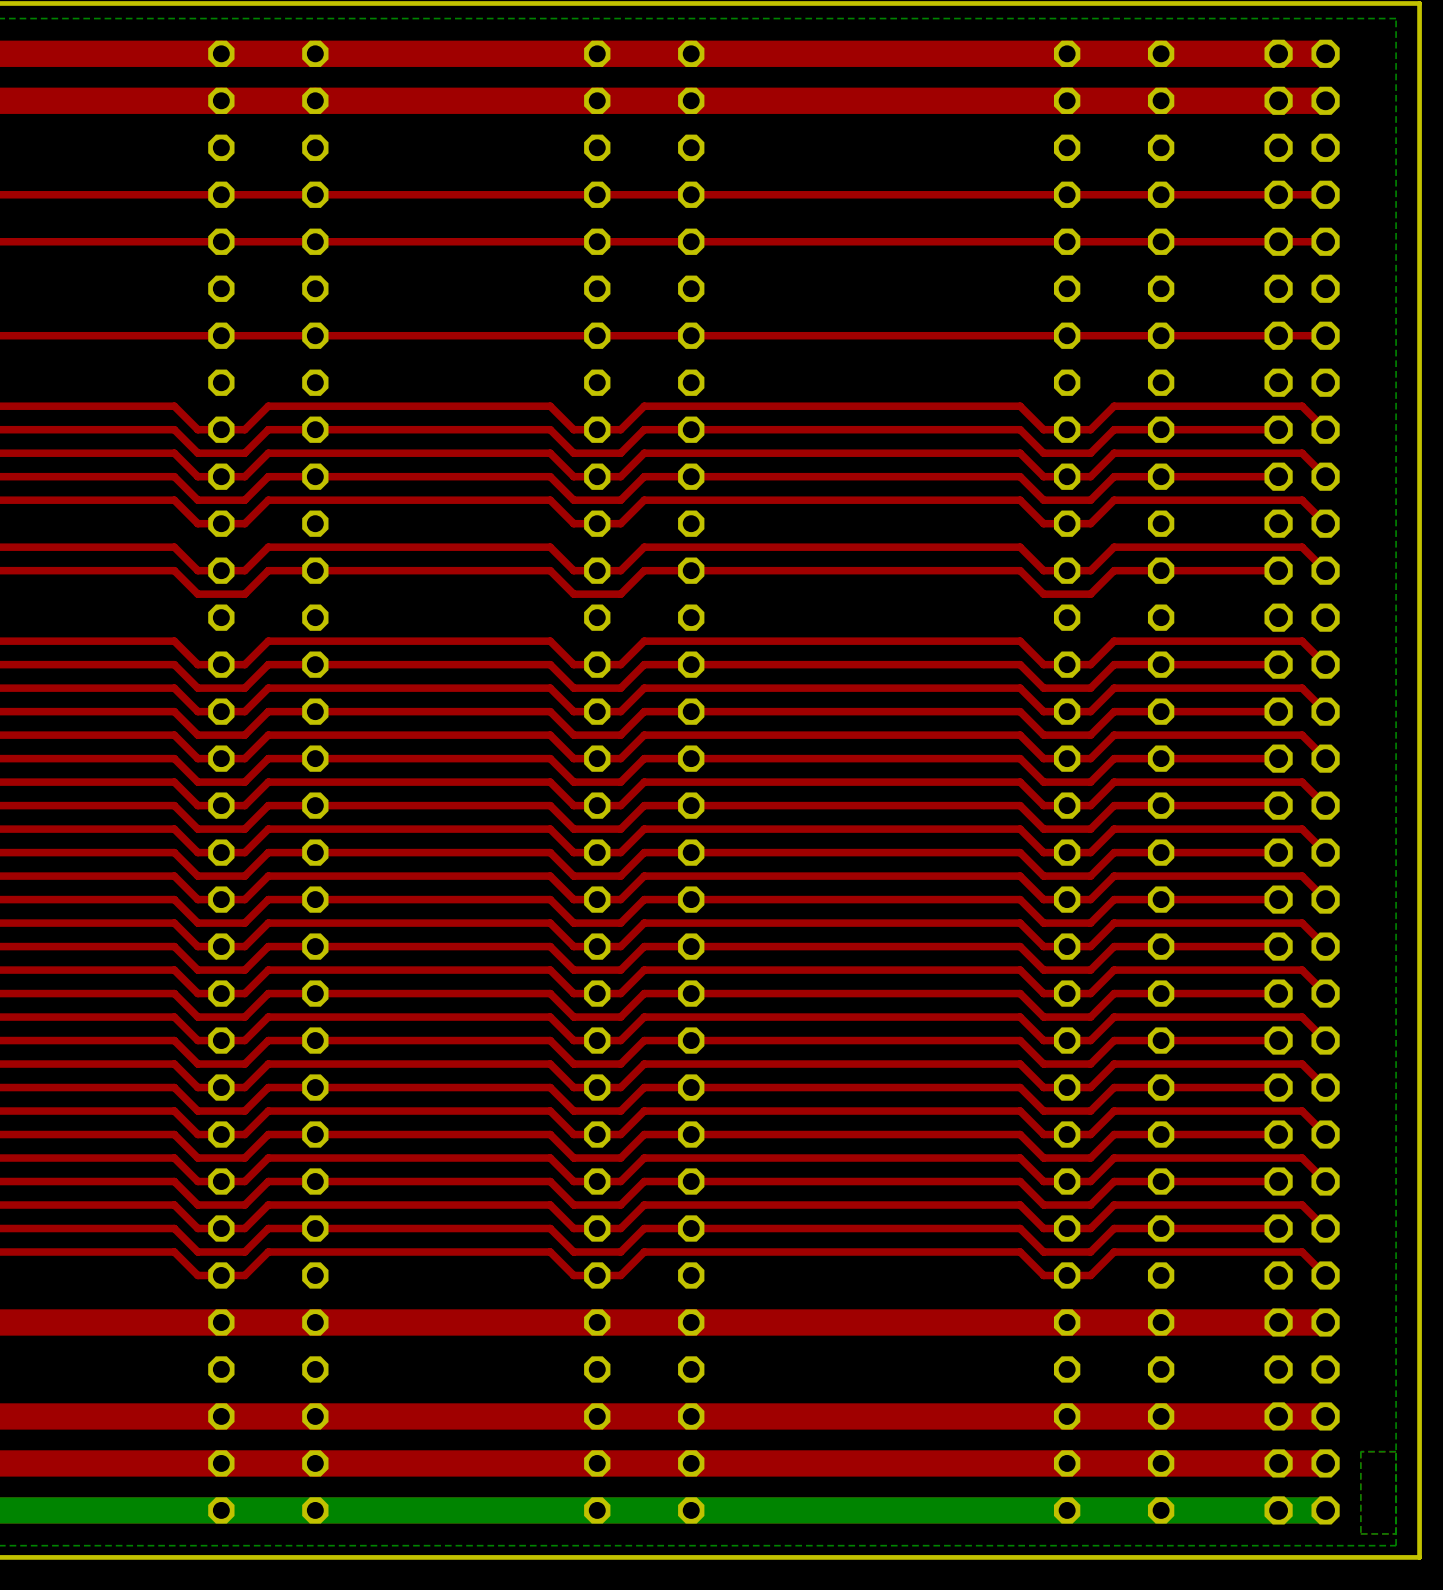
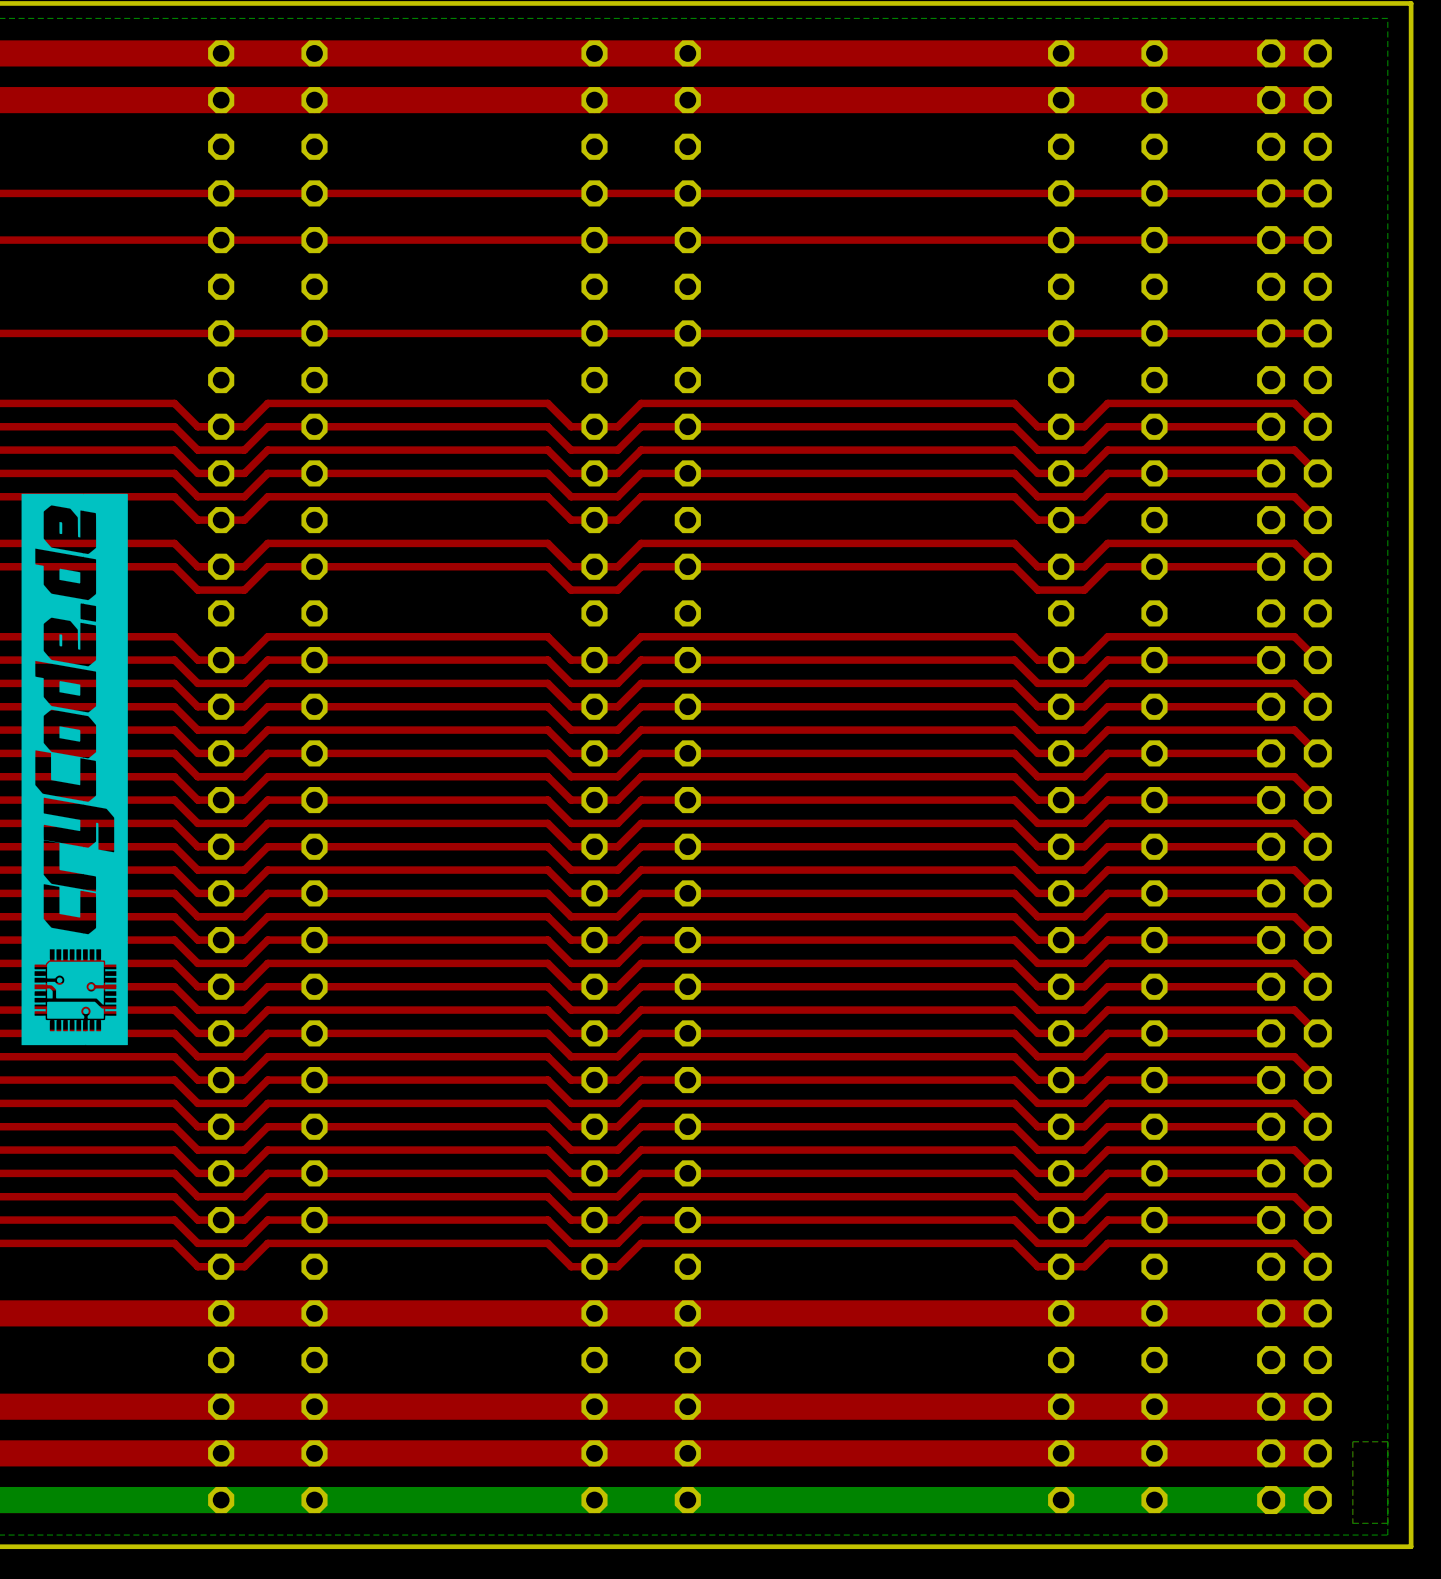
drawing: none -> [21, 493, 128, 1046]

